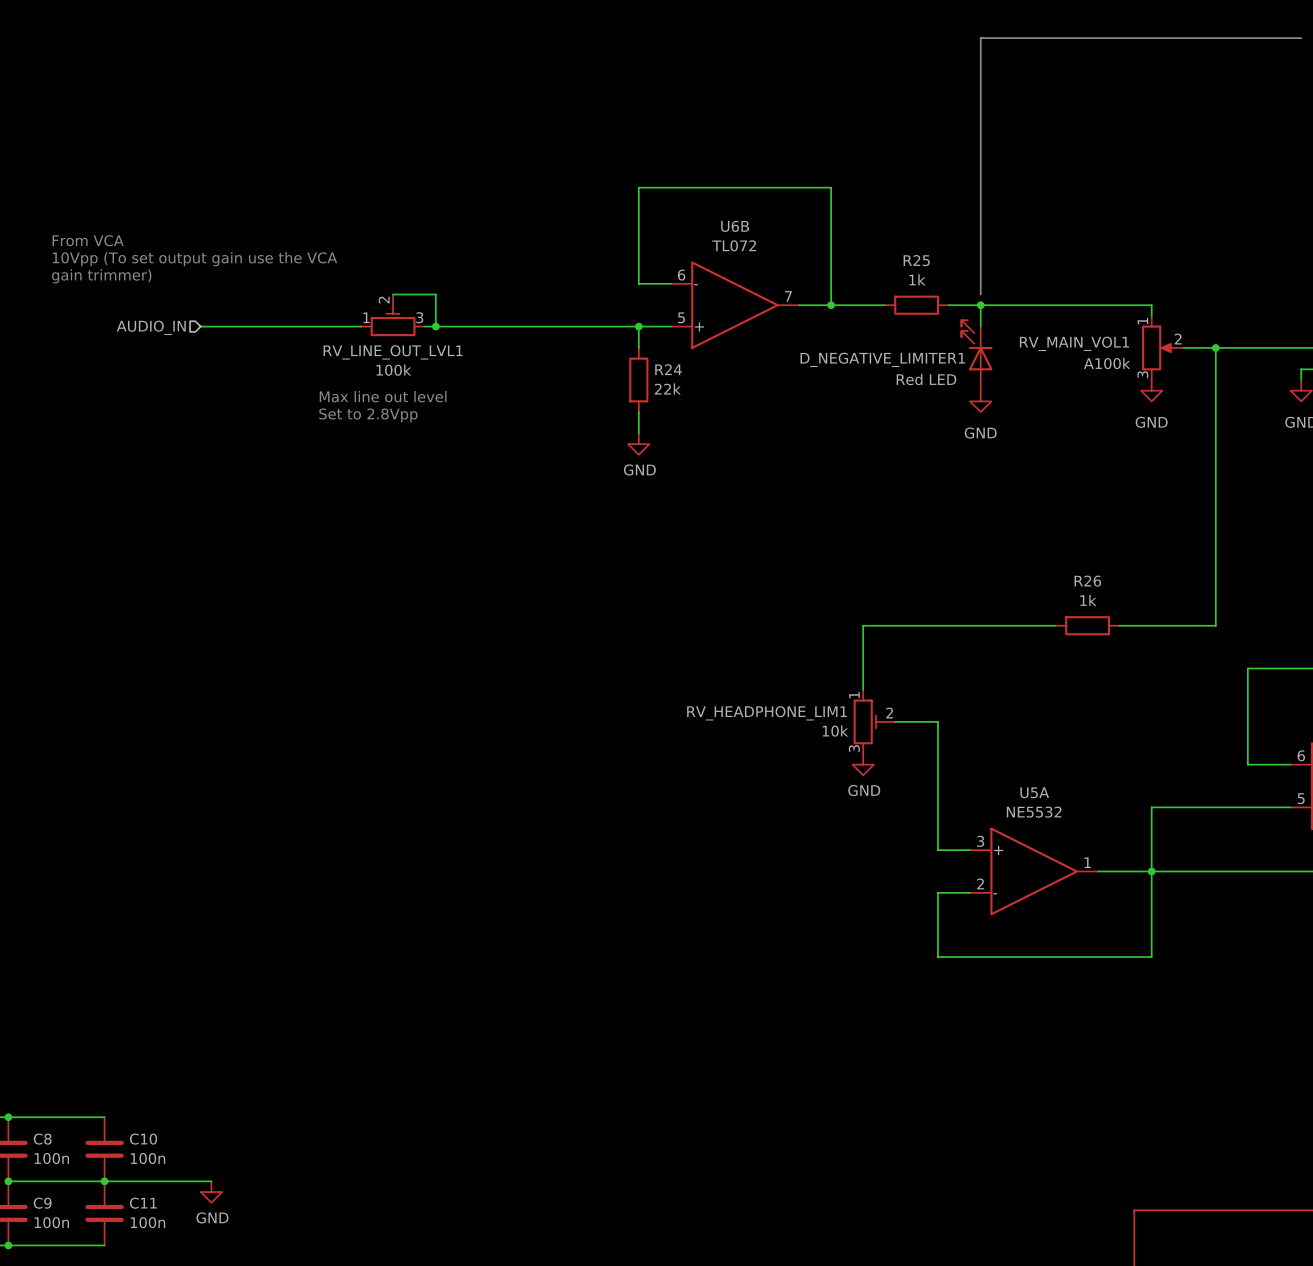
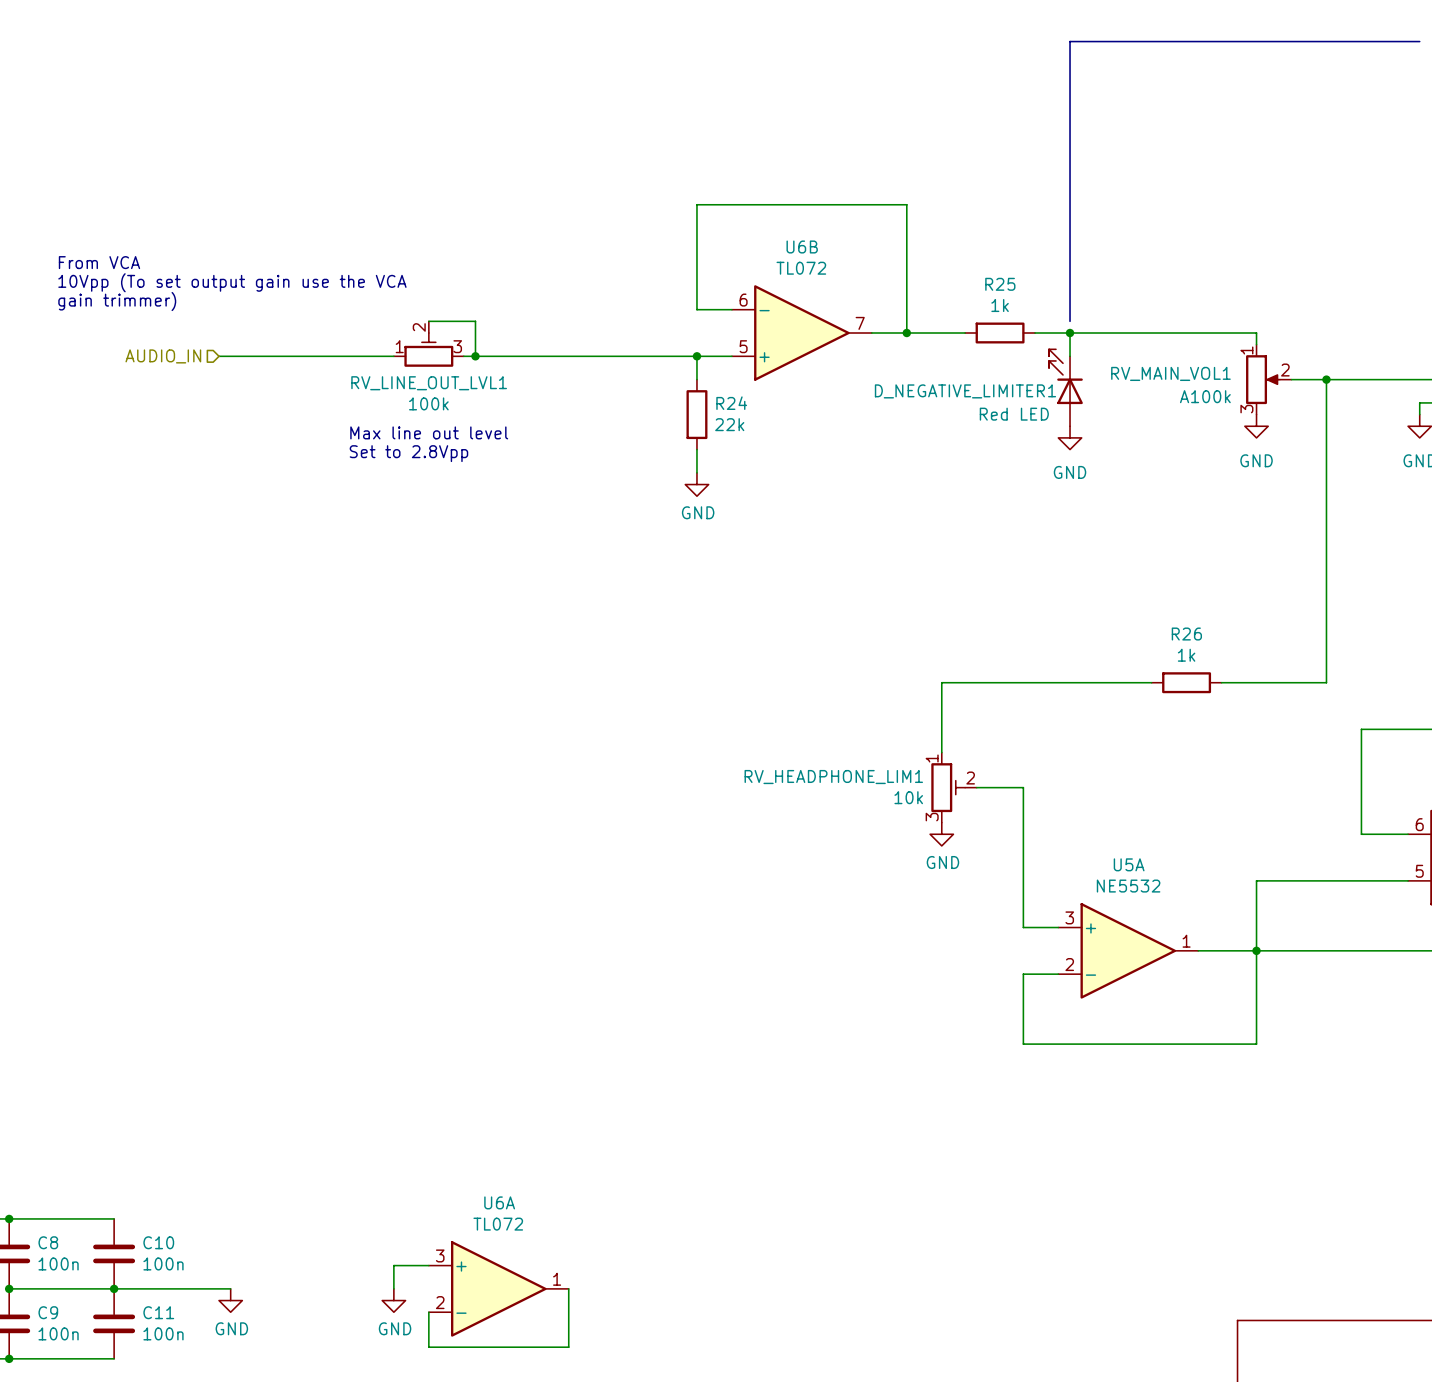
wire: none -> (428, 1265) (393, 1265) (393, 1288)
U6A: none -> TL072 (498, 1288)
wire: none -> (568, 1288) (568, 1347) (428, 1347) (428, 1312)
power symbol: none -> GND (393, 1300)

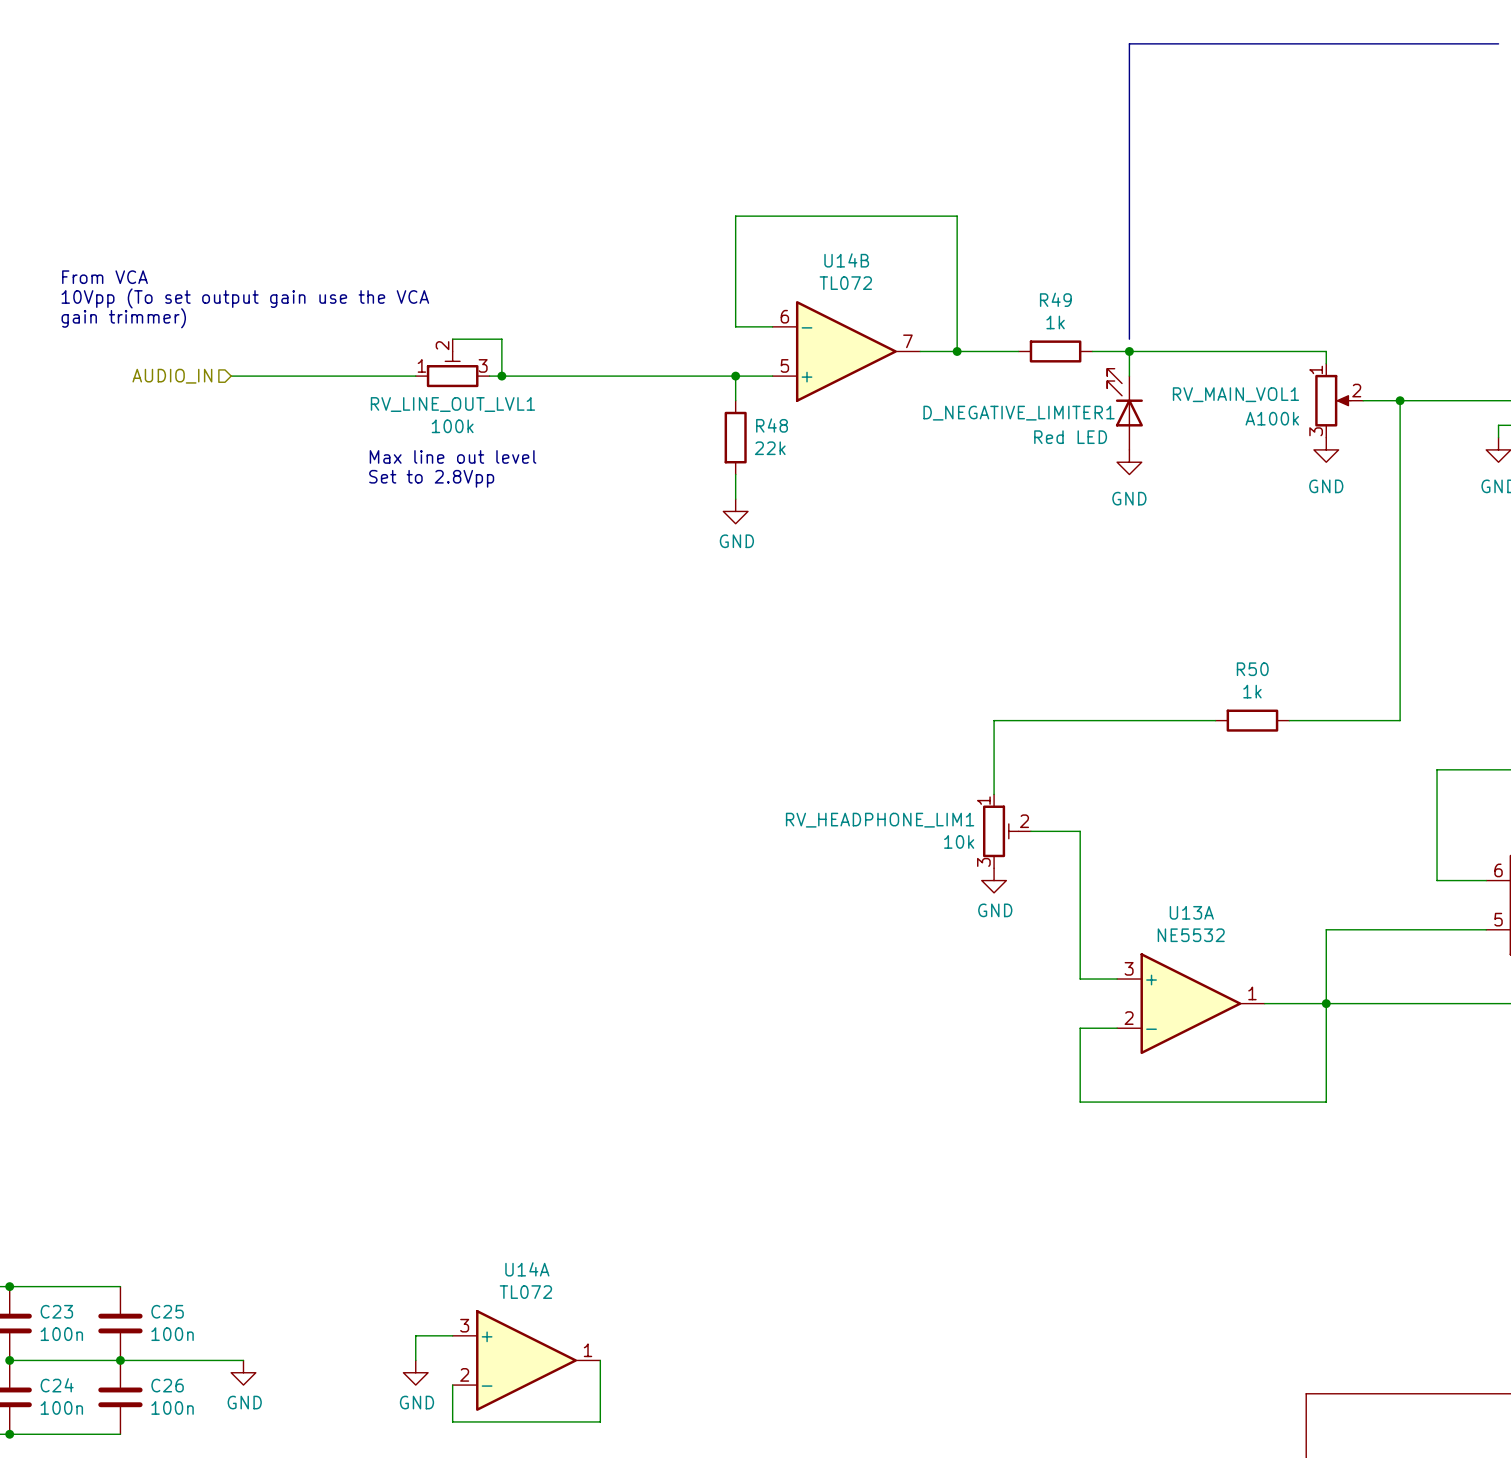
U6B name: U6B (802, 247) -> U14B (846, 260)
R25 name: R25 (1000, 284) -> R49 (1055, 299)
R24 name: R24 (731, 403) -> R48 (772, 425)
R26 name: R26 (1186, 634) -> R50 (1252, 669)
U5A name: U5A (1129, 864) -> U13A (1191, 912)
U6A name: U6A (499, 1202) -> U14A (527, 1269)
C8 name: C8 (48, 1242) -> C23 (56, 1311)
C10 name: C10 (158, 1242) -> C25 (167, 1311)
C9 name: C9 (48, 1312) -> C24 (57, 1385)
C11 name: C11 (158, 1312) -> C26 (167, 1385)

